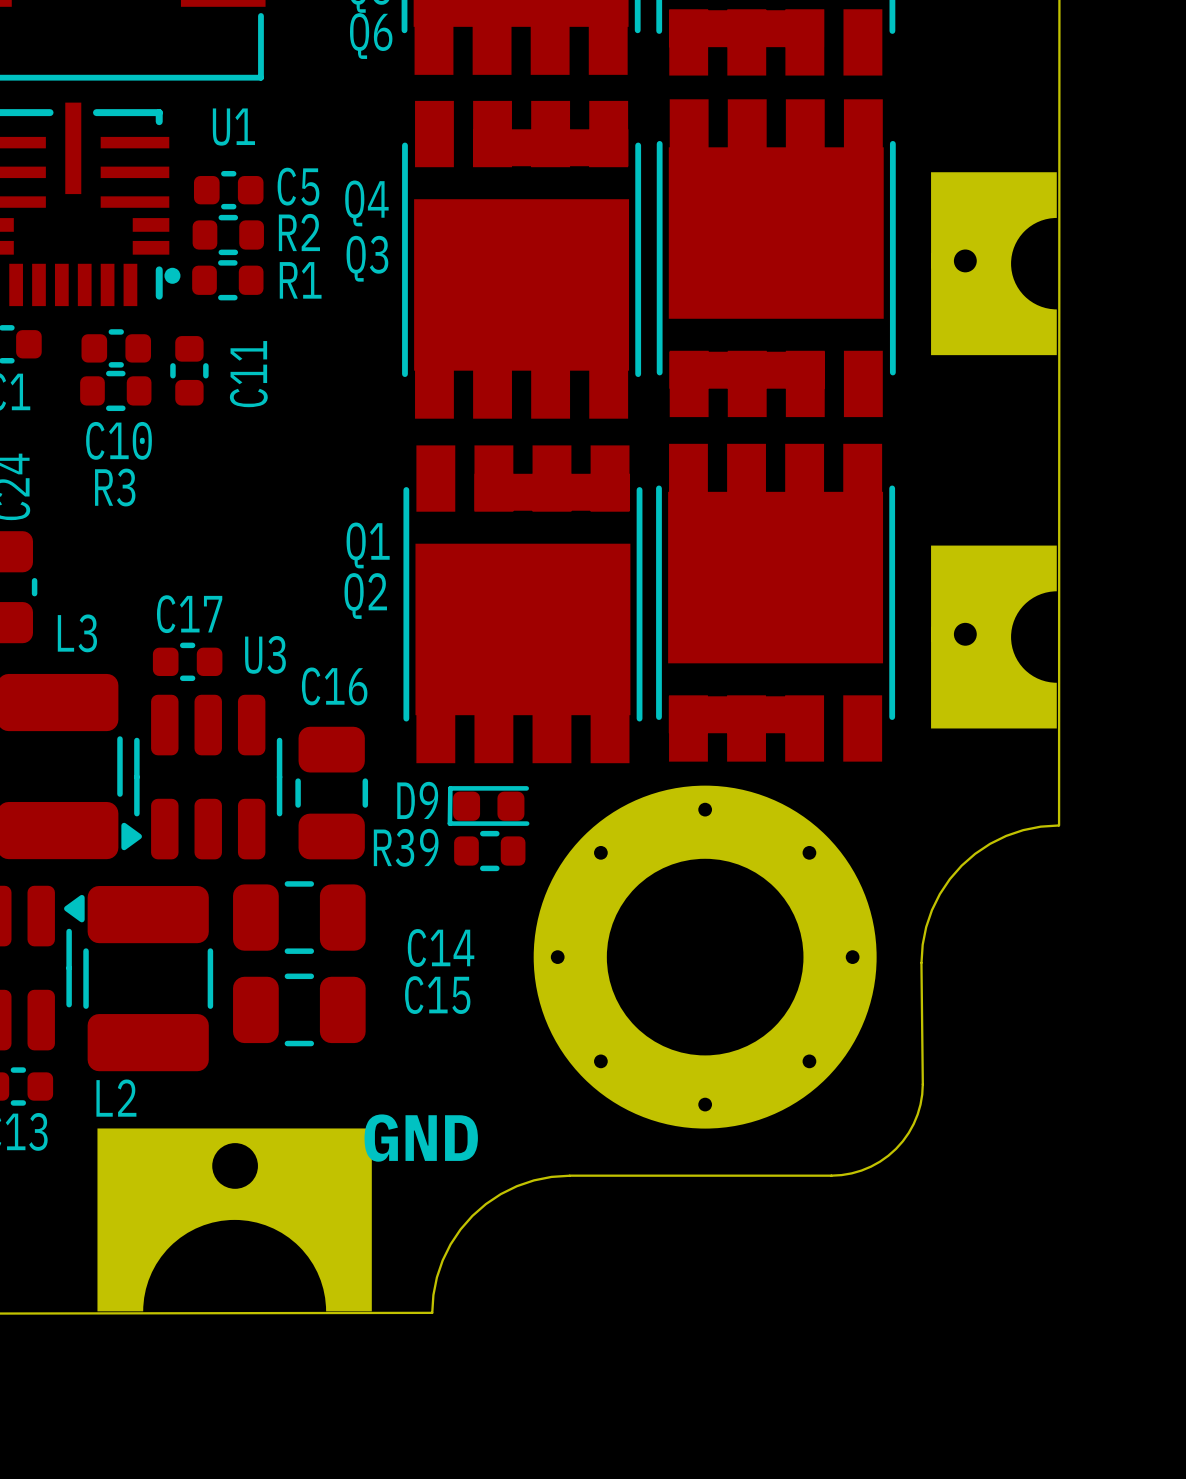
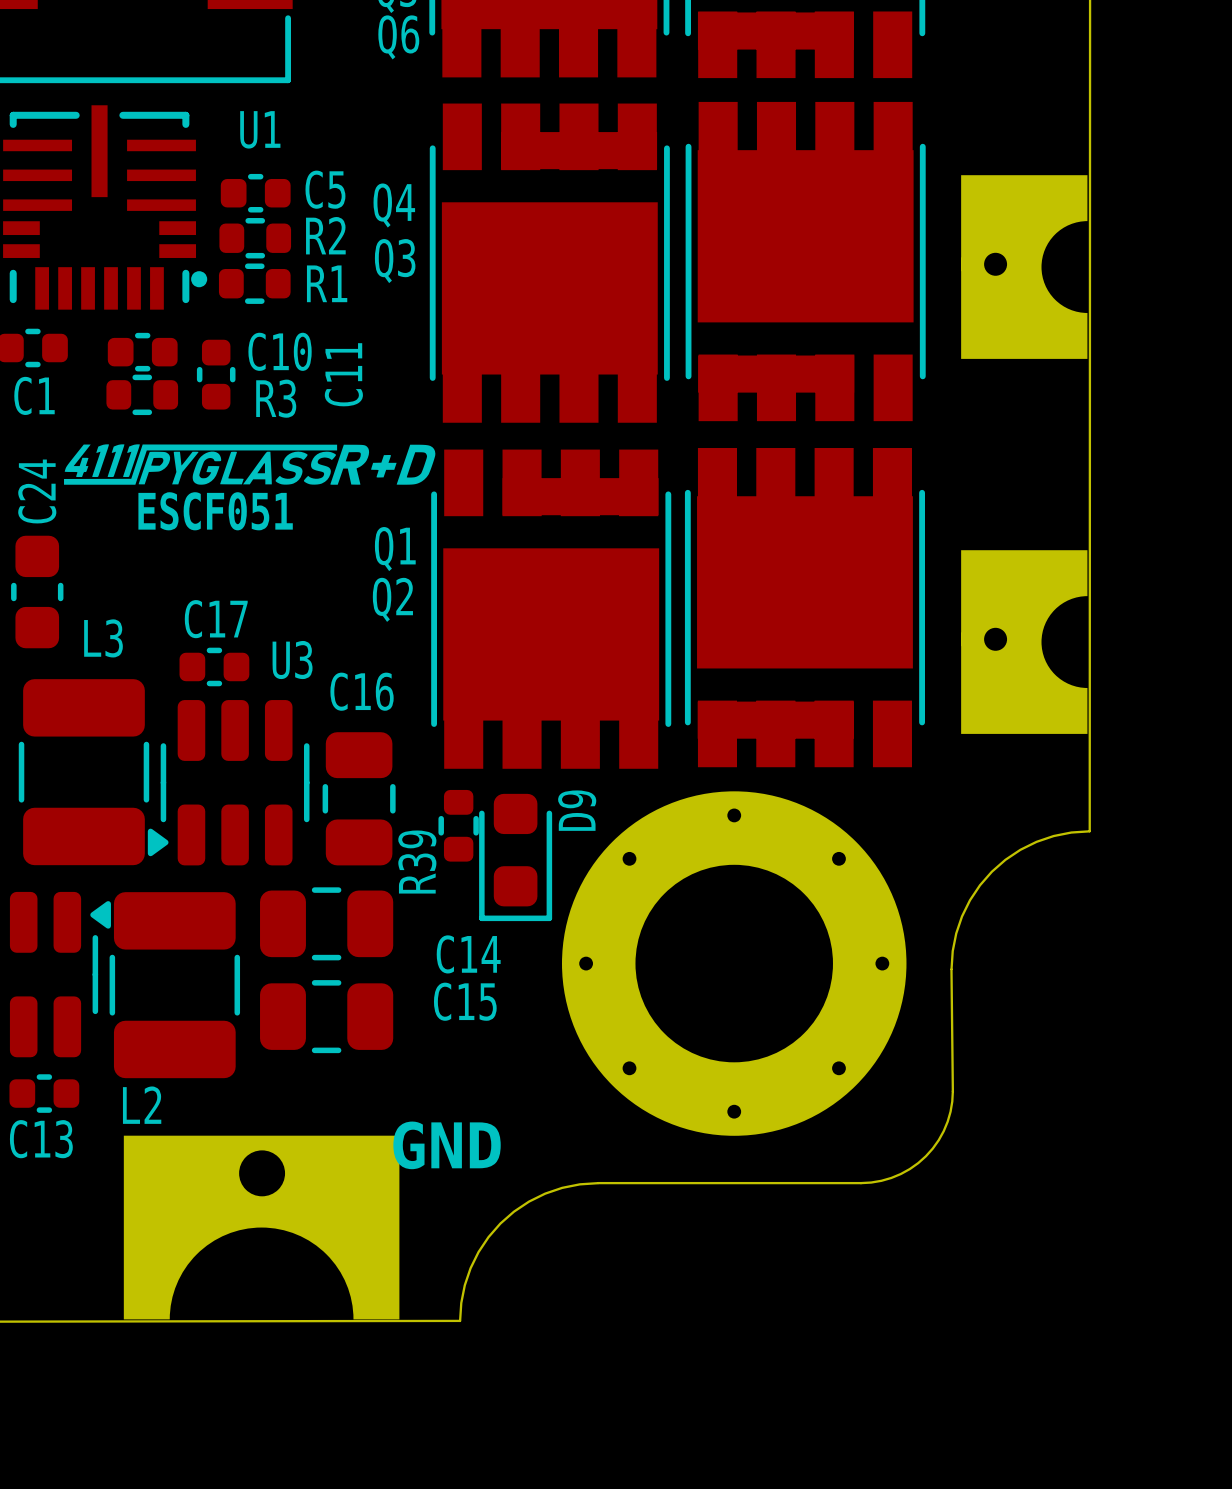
C11 name position: C11 (248, 374) -> C11 (343, 374)
drawing: none -> [64, 444, 436, 485]
C10 name position: C10 (119, 440) -> C10 (280, 351)
R3 name position: R3 (115, 487) -> R3 (276, 398)
text: none -> ESCF051 (215, 511)
D9 footprint: [447, 786, 530, 826] -> [479, 793, 553, 922]
D9 name position: D9 (417, 800) -> D9 (577, 810)
R39 rotation: 0° (489, 851) -> 90° clockwise (458, 825)
R39 position: (489, 851) -> (458, 825)

